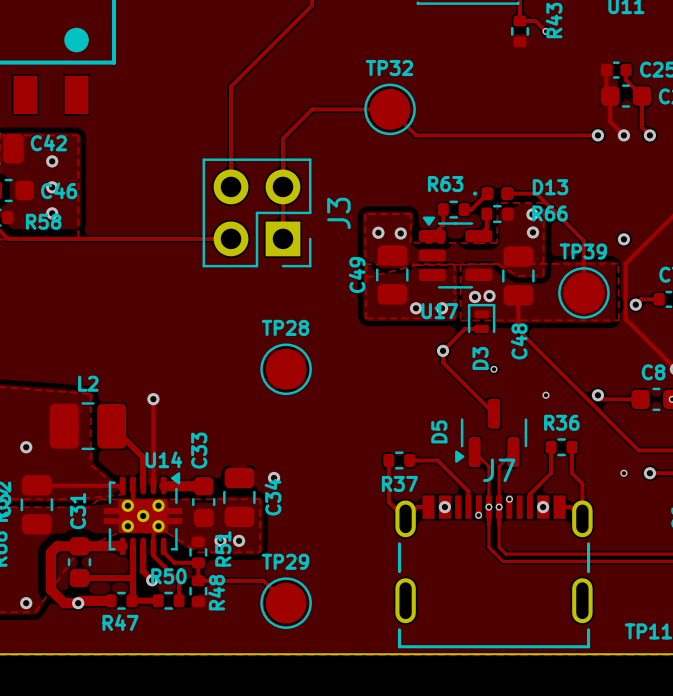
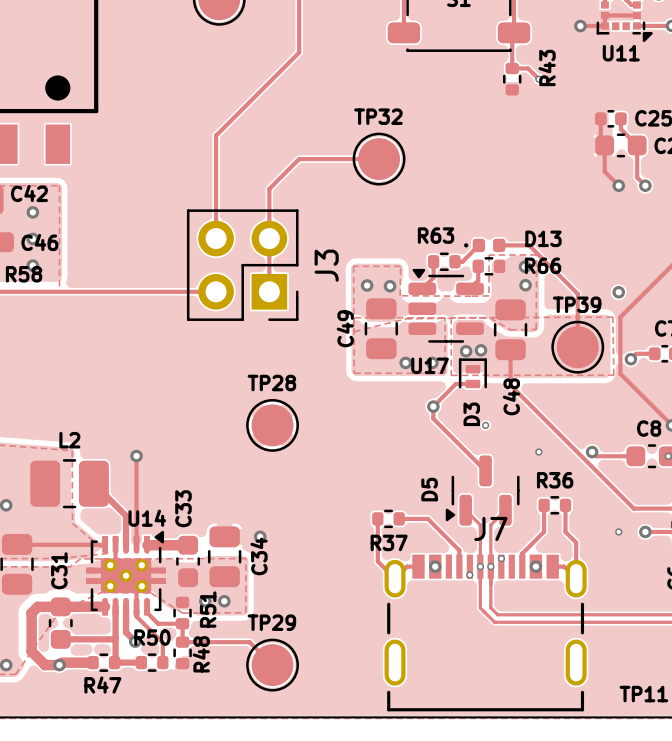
track: (390, 109) (416, 135) (597, 135) -> none
via: (597, 135) -> none

